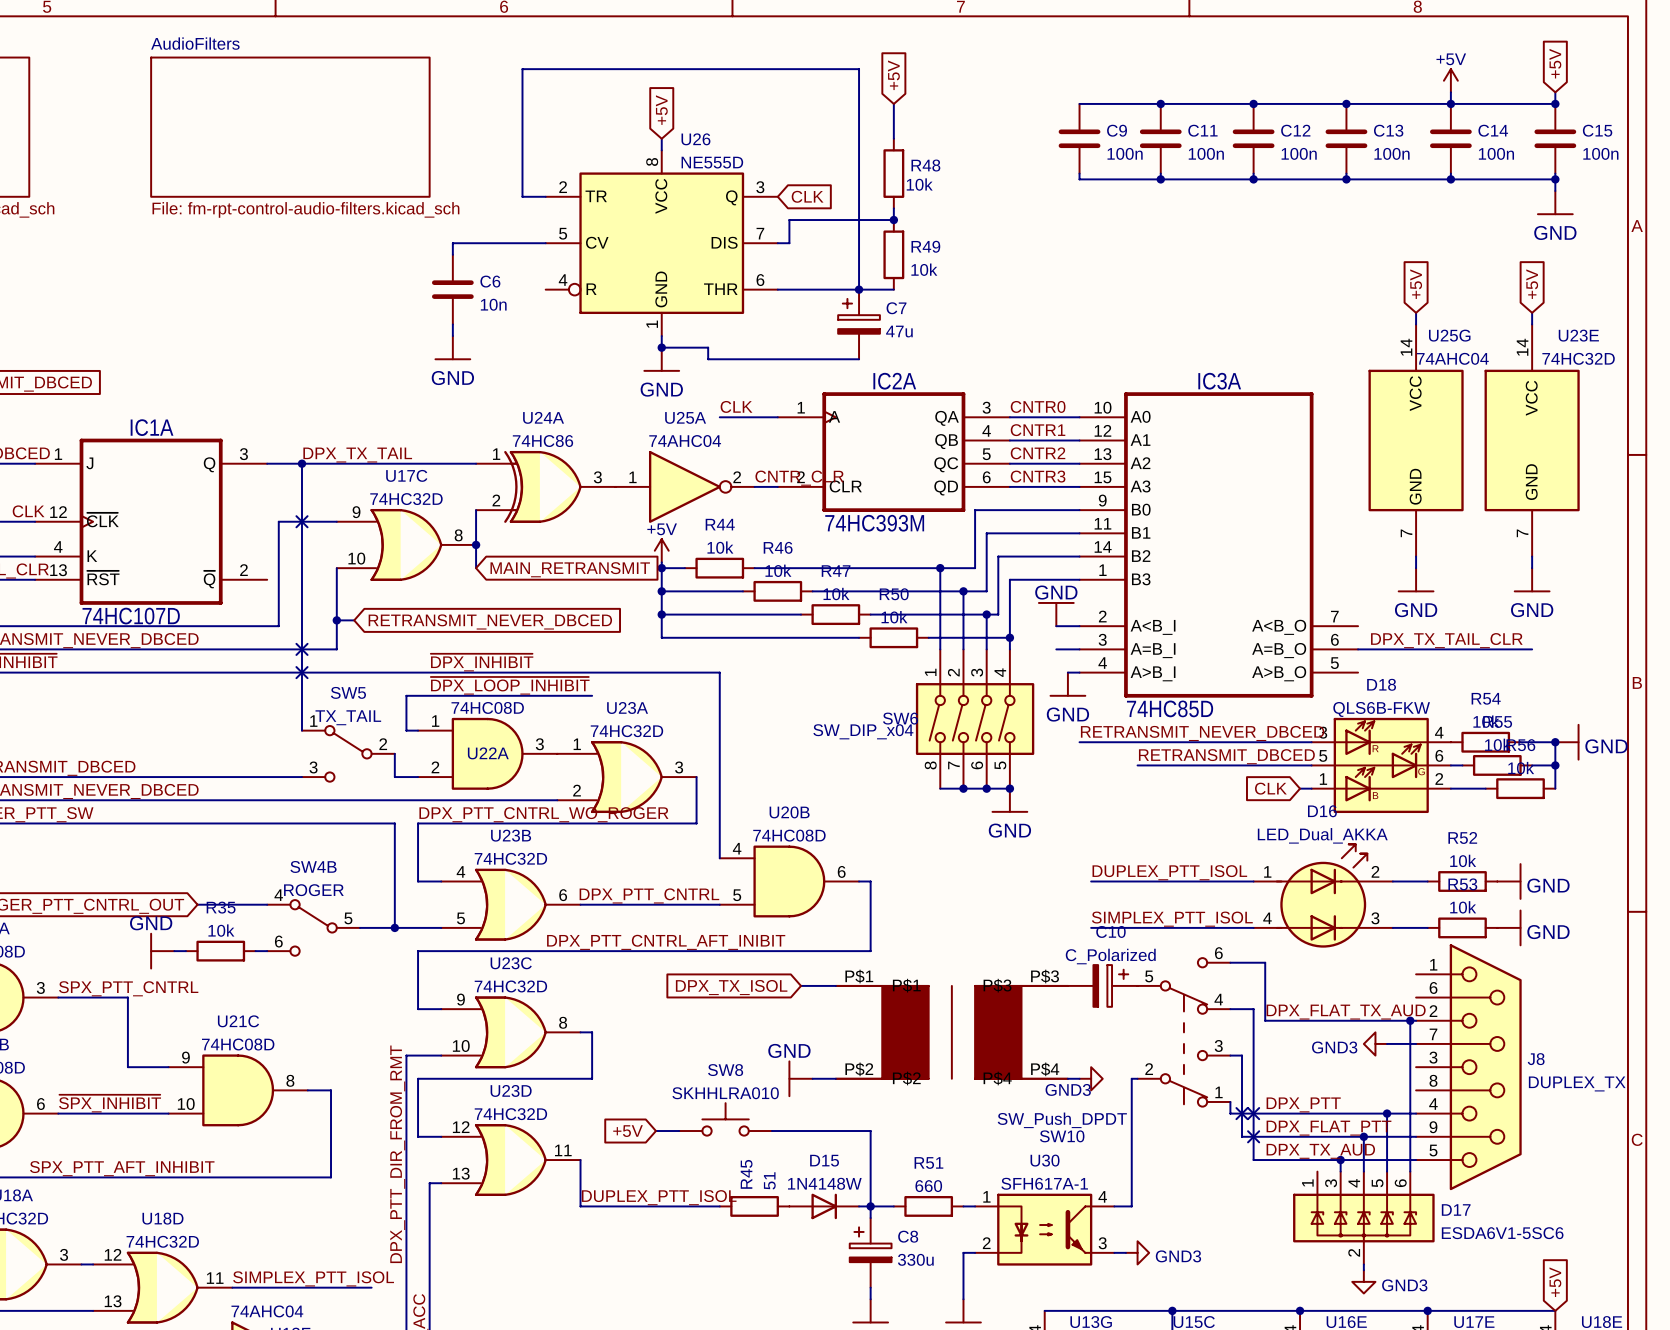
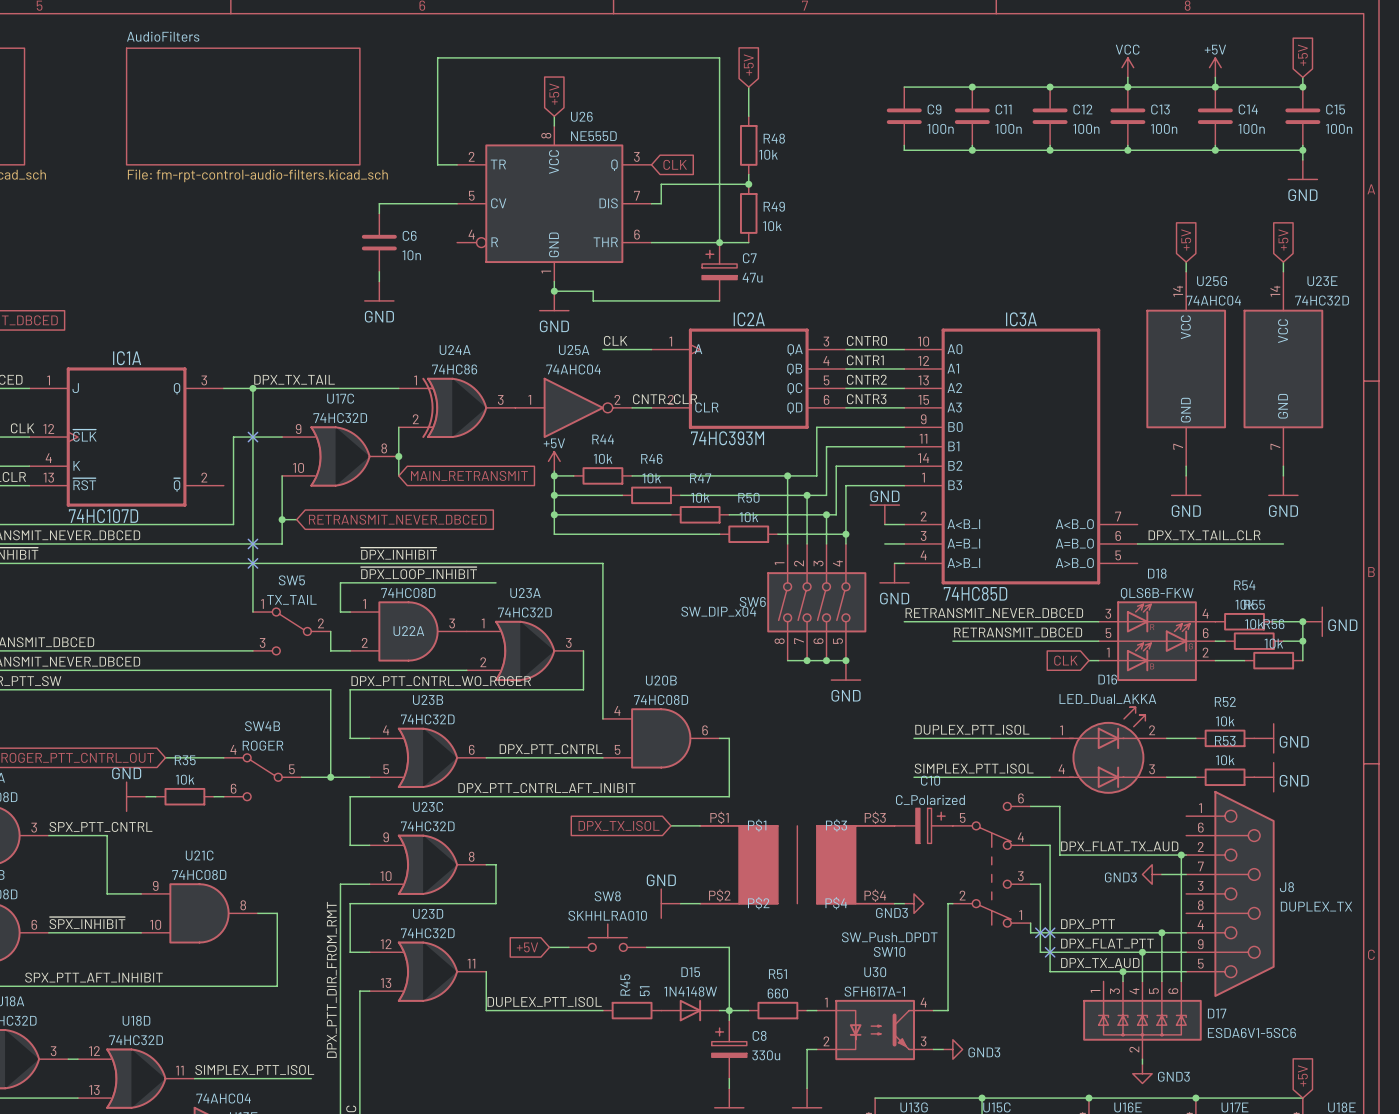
power symbol: none -> VCC (1127, 67)
wire: none -> (1127, 77) (1127, 87)

